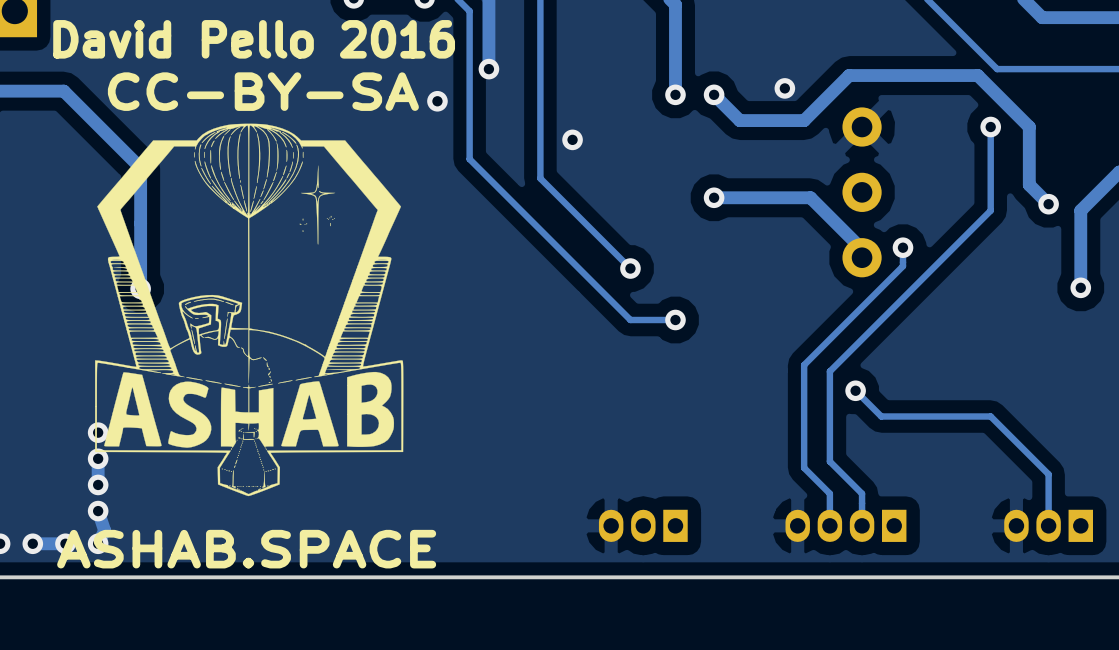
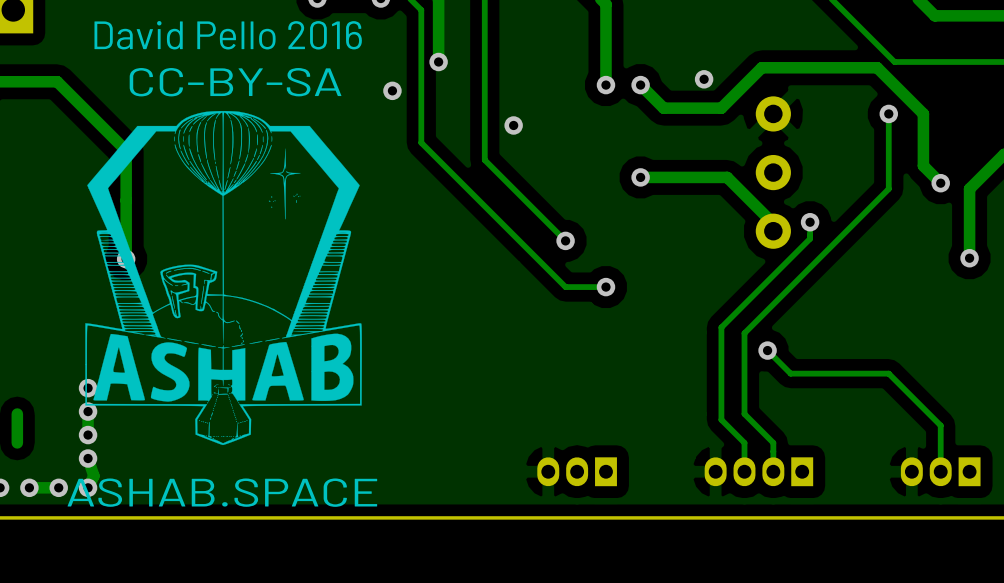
track: none -> (17, 414) (17, 442)

